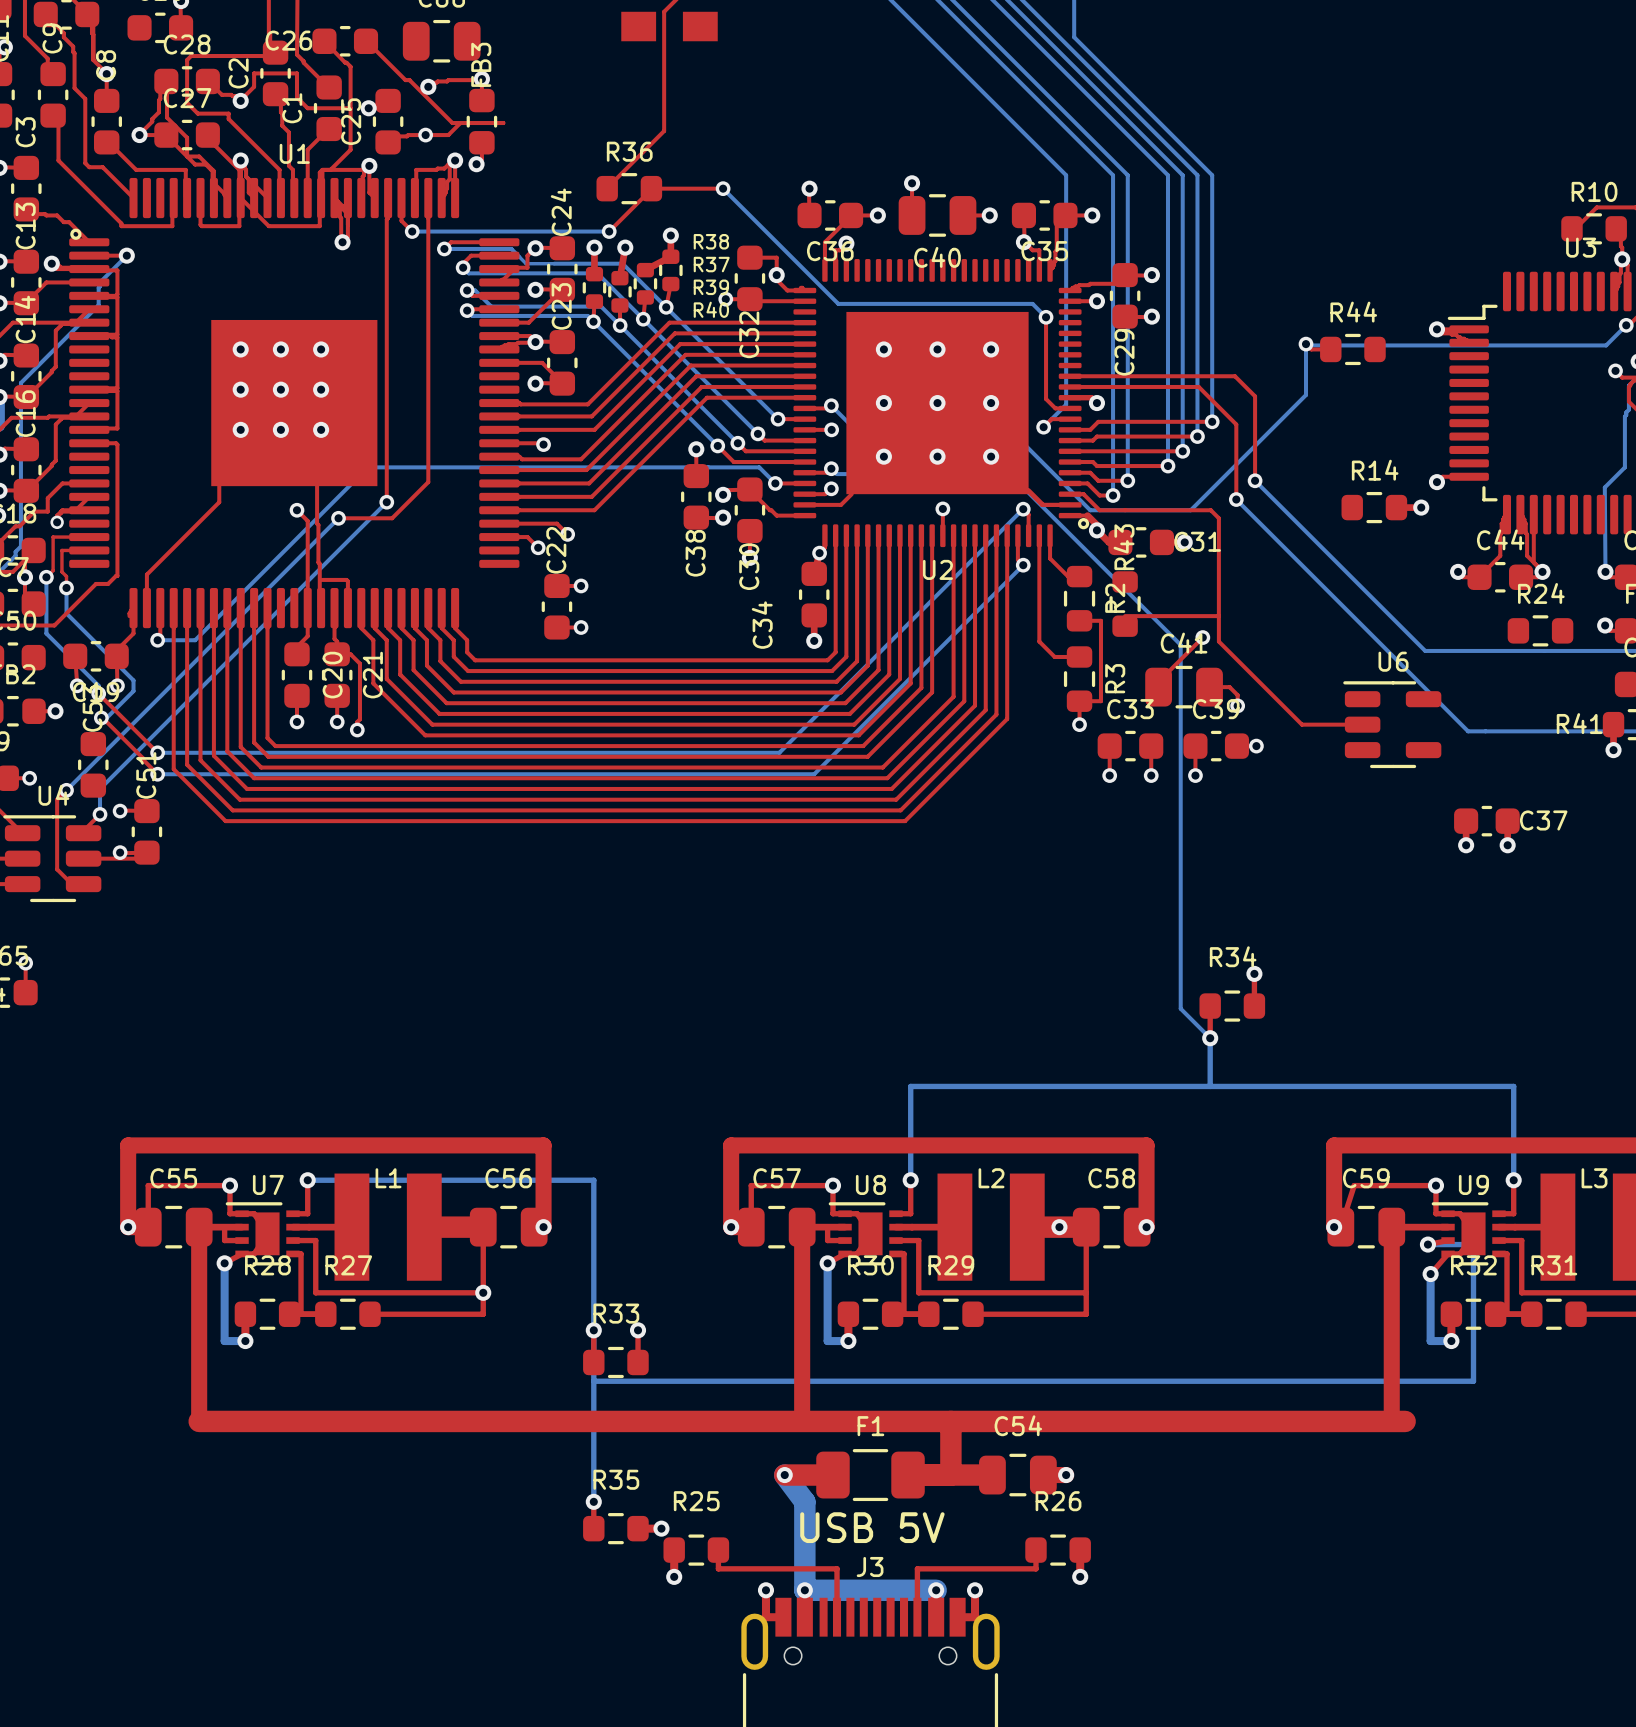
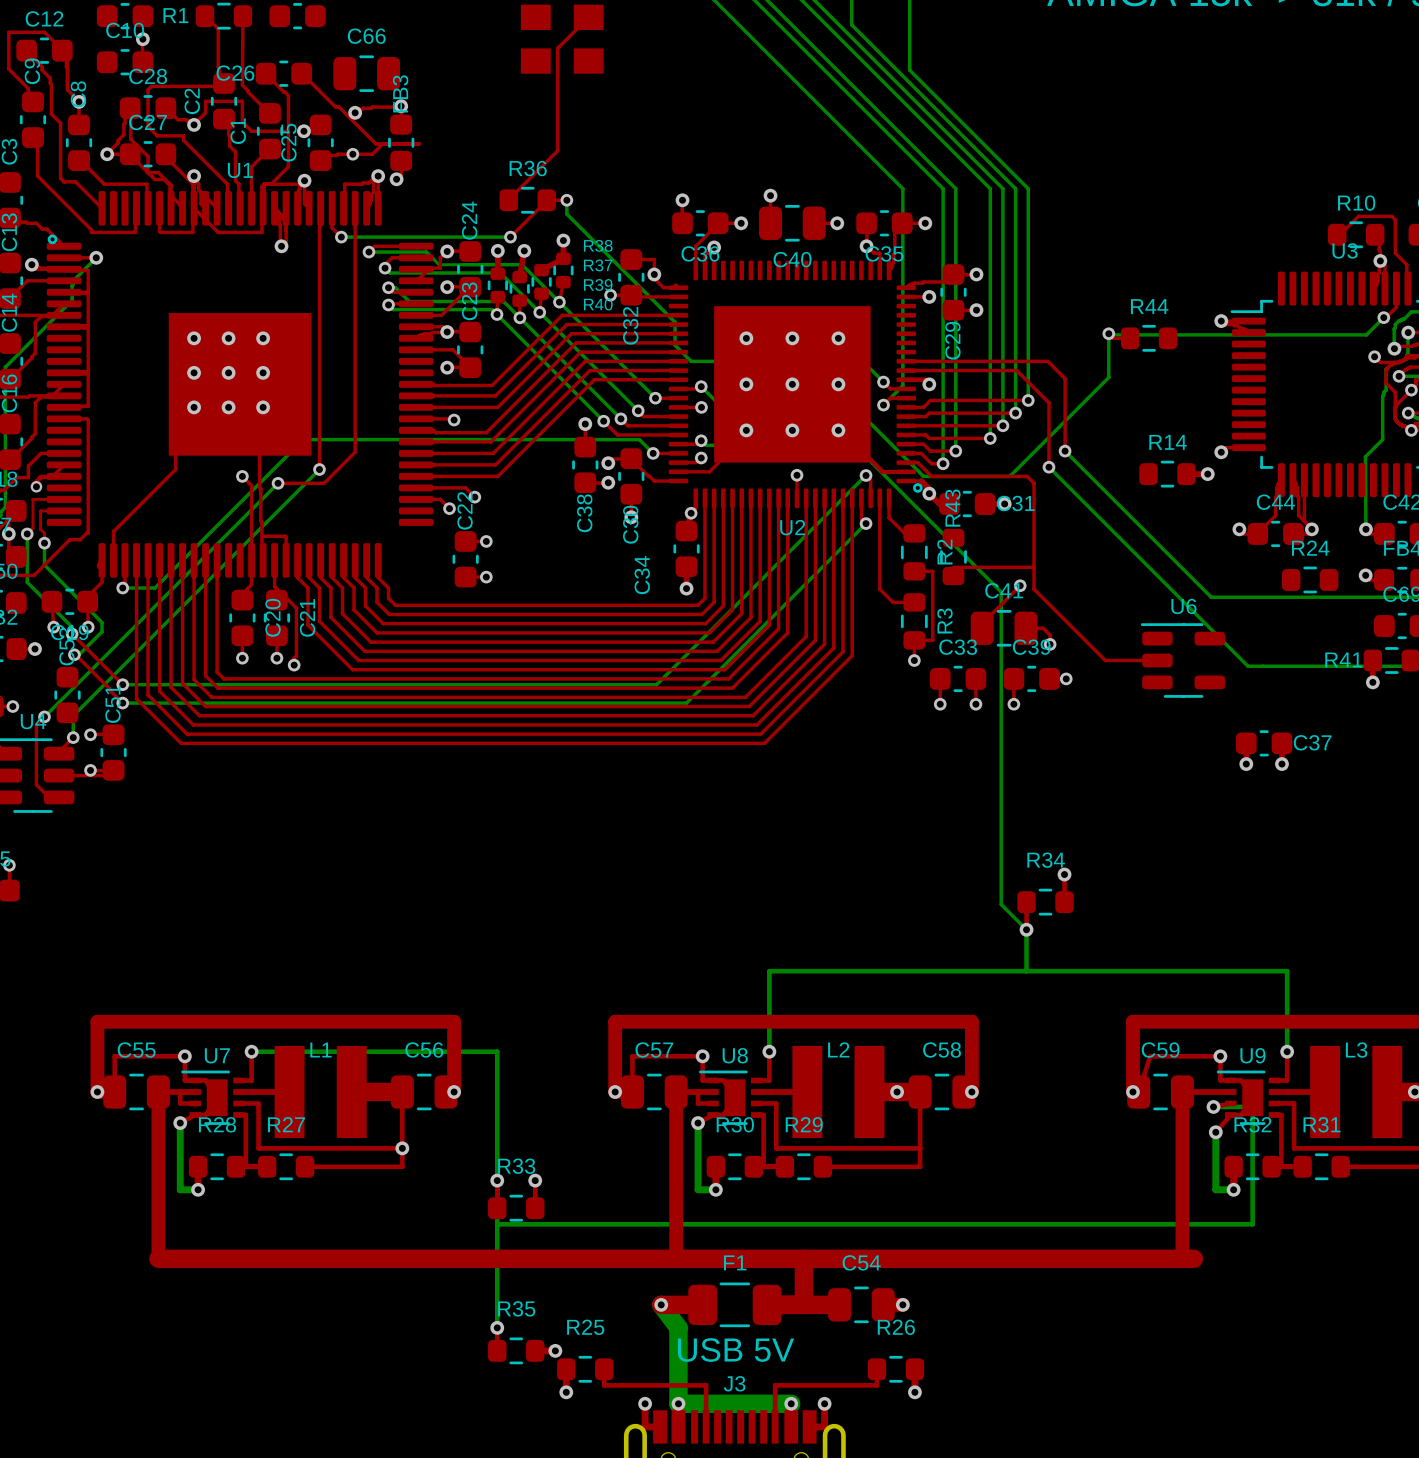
top track: (674, 188) (723, 188) -> none
bottom track: none -> (566, 200) (566, 214) (675, 322) (675, 345) (691, 361) (862, 361) (883, 382)
bottom track: (723, 188) (838, 303) (1032, 303) (1046, 317) -> none
via position: (723, 188) -> (566, 200)
top track: (1046, 317) (1046, 399) (1055, 408) -> (883, 382) (890, 388) (893, 388)
via position: (1046, 317) -> (883, 382)

